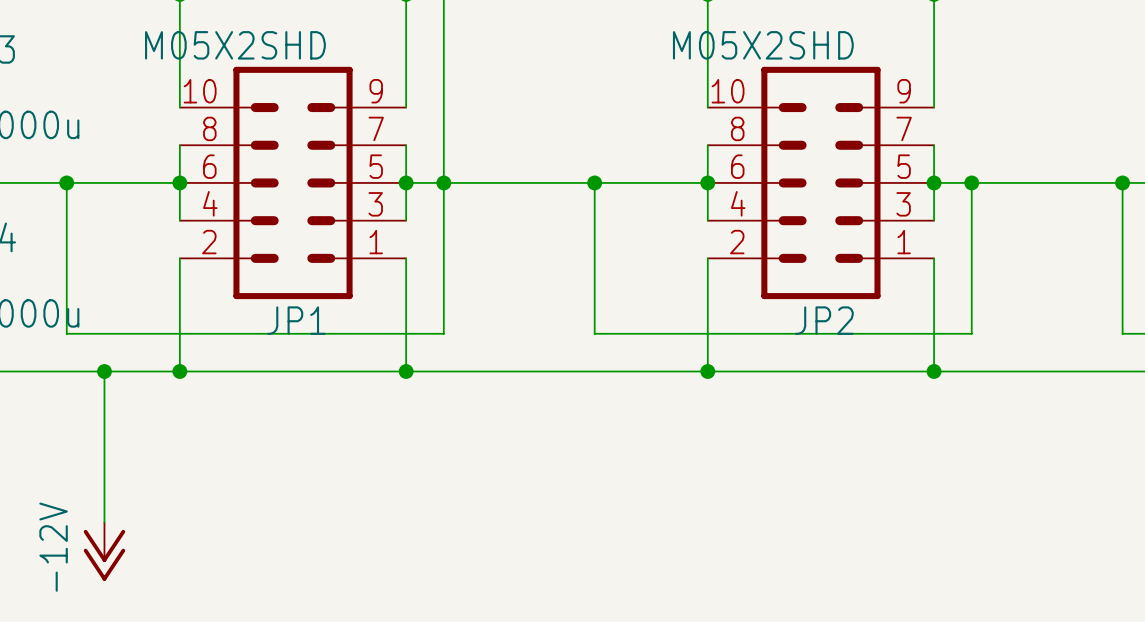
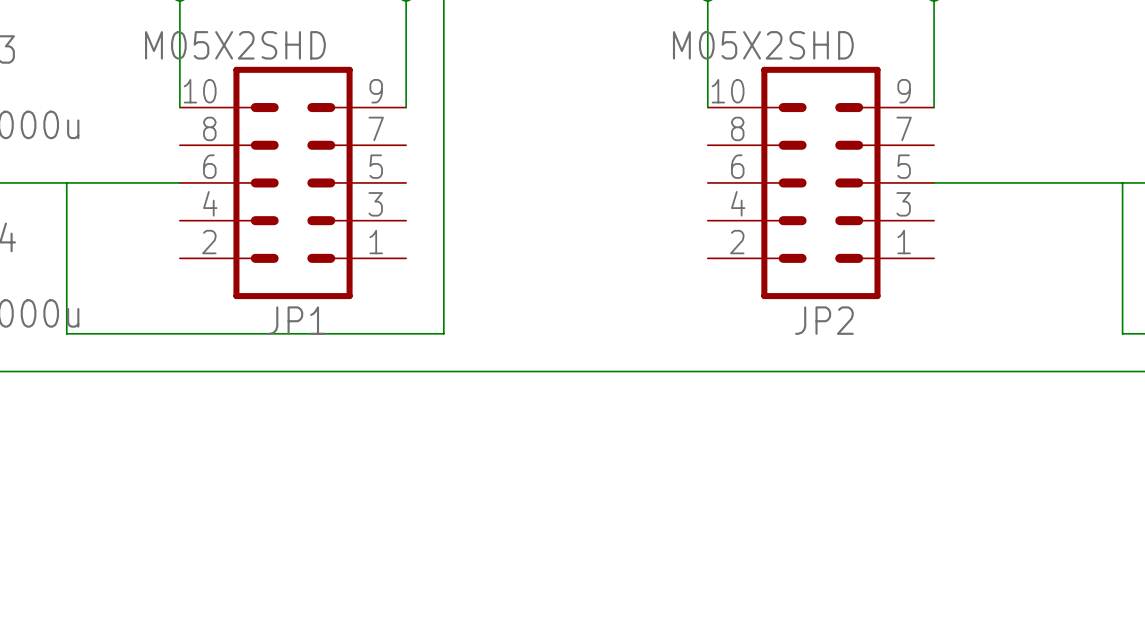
wire: (179, 145) (179, 220) -> none
wire: (406, 145) (406, 220) -> none
wire: (707, 145) (707, 220) -> none
wire: (934, 145) (934, 220) -> none
junction: (66, 182) -> none
junction: (179, 182) -> none
wire: (406, 182) (707, 182) -> none
junction: (406, 182) -> none
junction: (443, 182) -> none
wire: (594, 182) (594, 333) (971, 333) (971, 182) -> none
junction: (594, 182) -> none
junction: (707, 182) -> none
junction: (934, 182) -> none
junction: (971, 182) -> none
junction: (1122, 182) -> none
wire: (179, 258) (179, 371) -> none
wire: (406, 258) (406, 371) -> none
wire: (707, 258) (707, 371) -> none
wire: (934, 258) (934, 371) -> none
wire: (104, 371) (104, 522) -> none
junction: (104, 371) -> none
junction: (179, 371) -> none
junction: (406, 371) -> none
junction: (707, 371) -> none
junction: (934, 371) -> none
power symbol: -12V (104, 551) -> none

